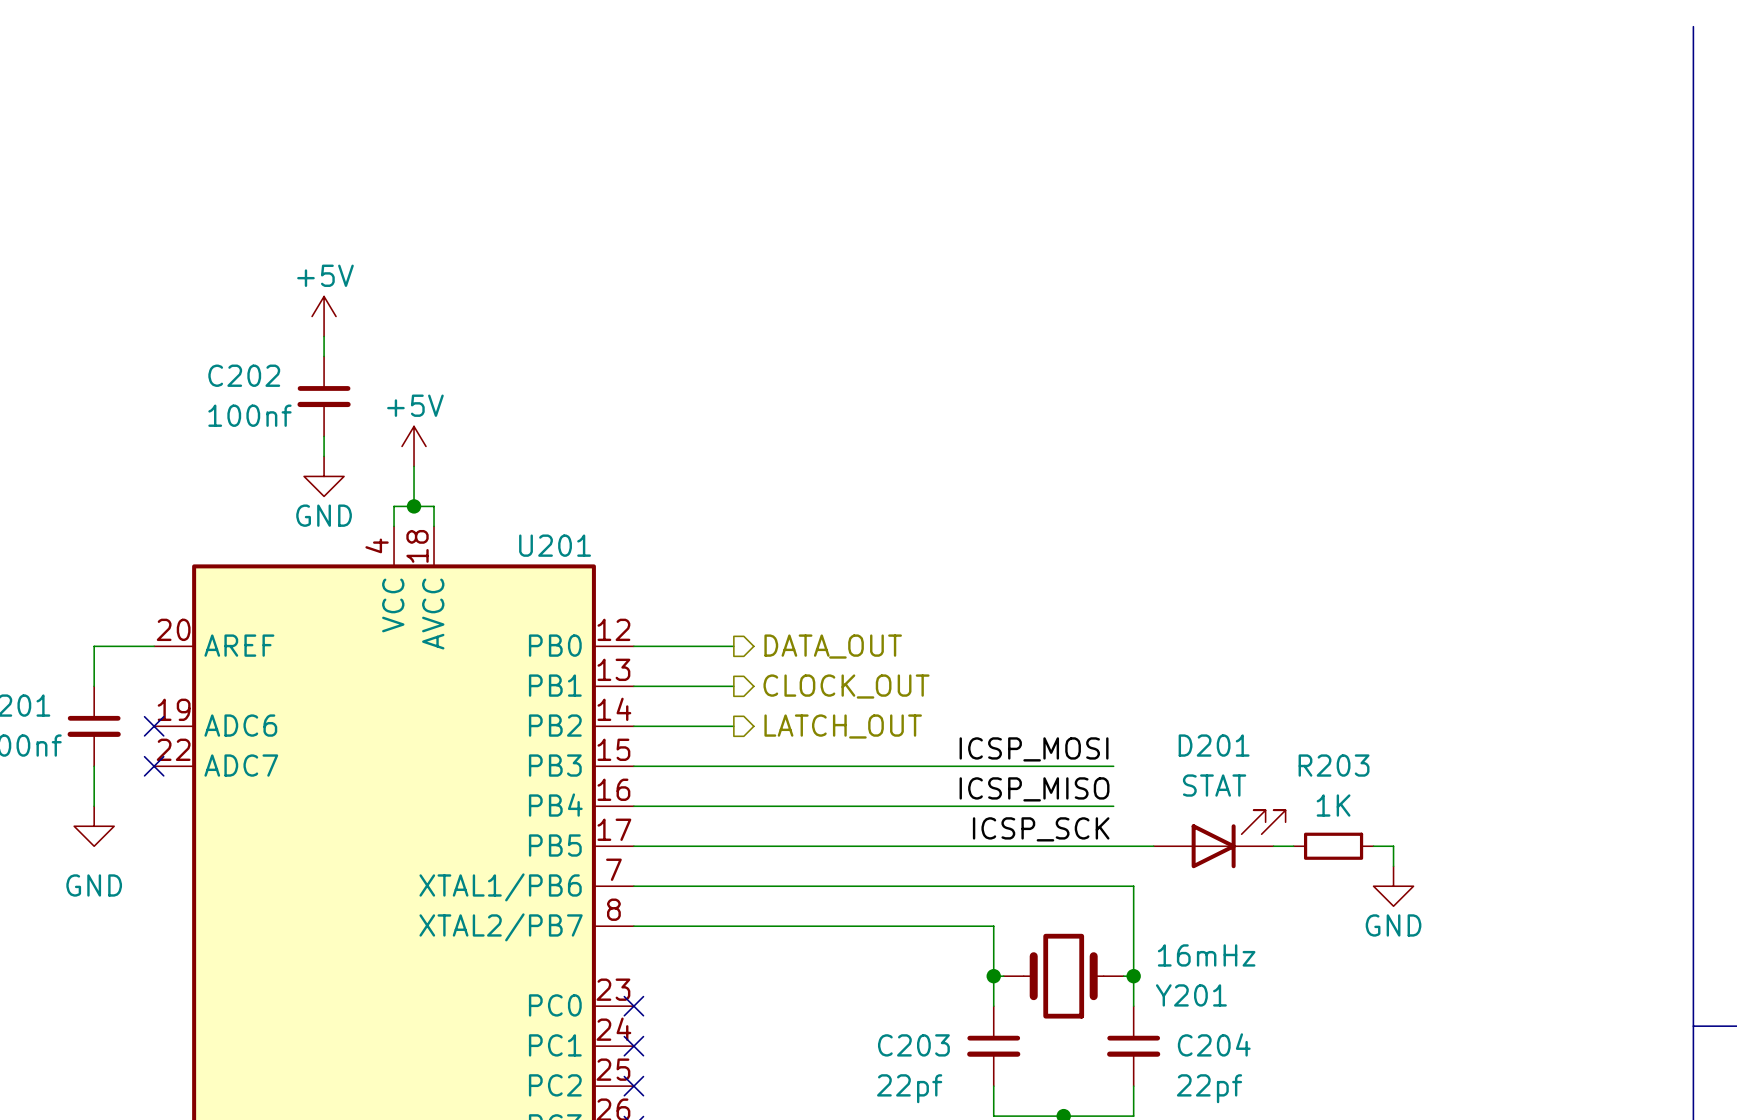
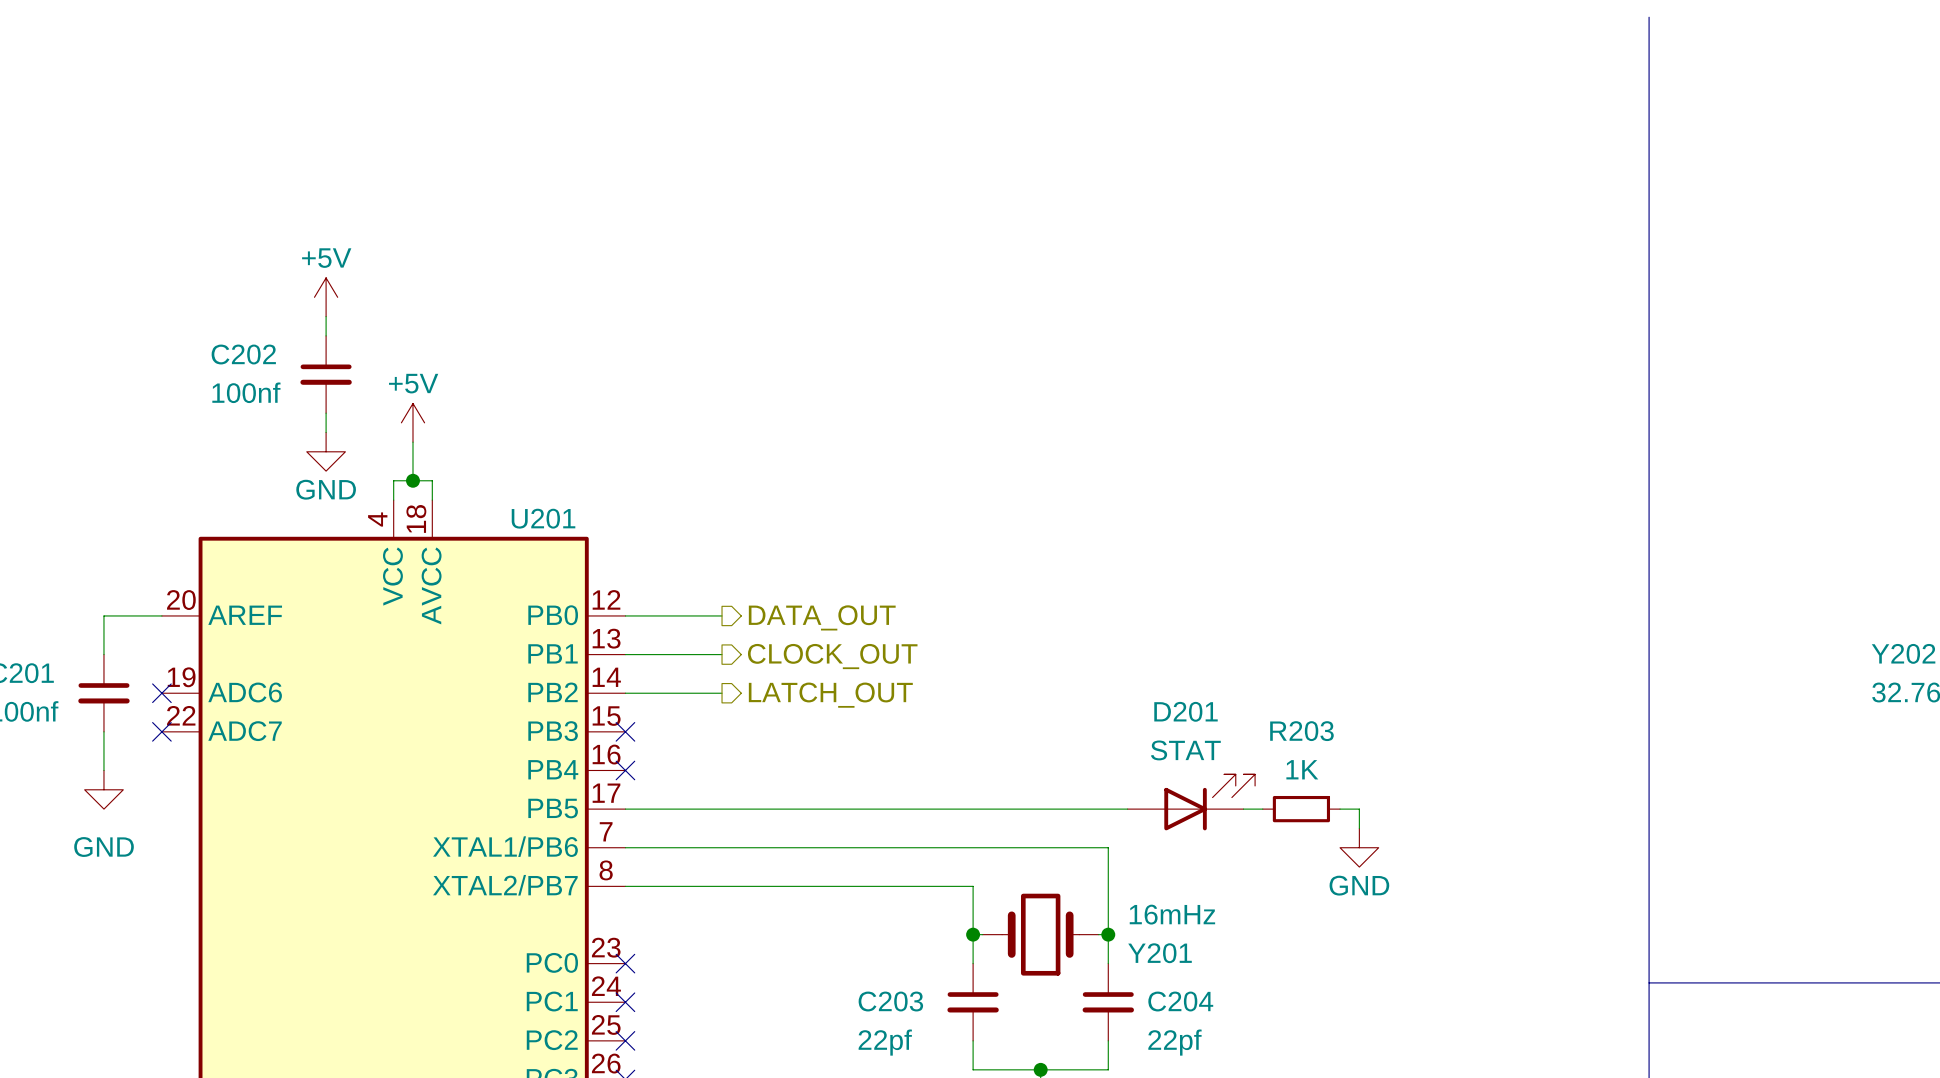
label: ICSP_MOSI (1034, 749) -> none
wire: (633, 766) (1113, 766) -> none
no-connect mark: none -> (625, 731)
label: ICSP_MISO (1034, 789) -> none
wire: (633, 806) (1113, 806) -> none
no-connect mark: none -> (625, 770)
label: ICSP_SCK (1041, 829) -> none

